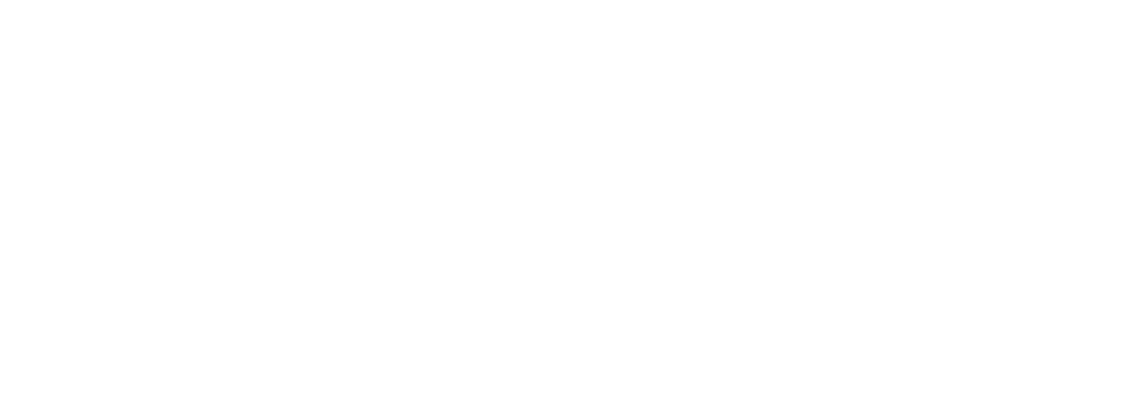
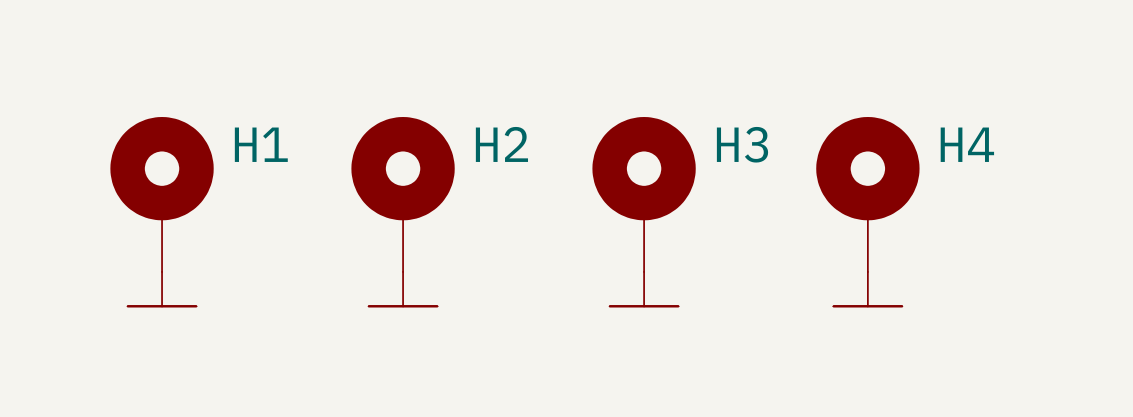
H1: none -> (162, 194)
H2: none -> (403, 194)
H3: none -> (644, 194)
H4: none -> (867, 194)
power symbol: none -> (162, 289)
power symbol: none -> (403, 289)
power symbol: none -> (644, 289)
power symbol: none -> (867, 289)

